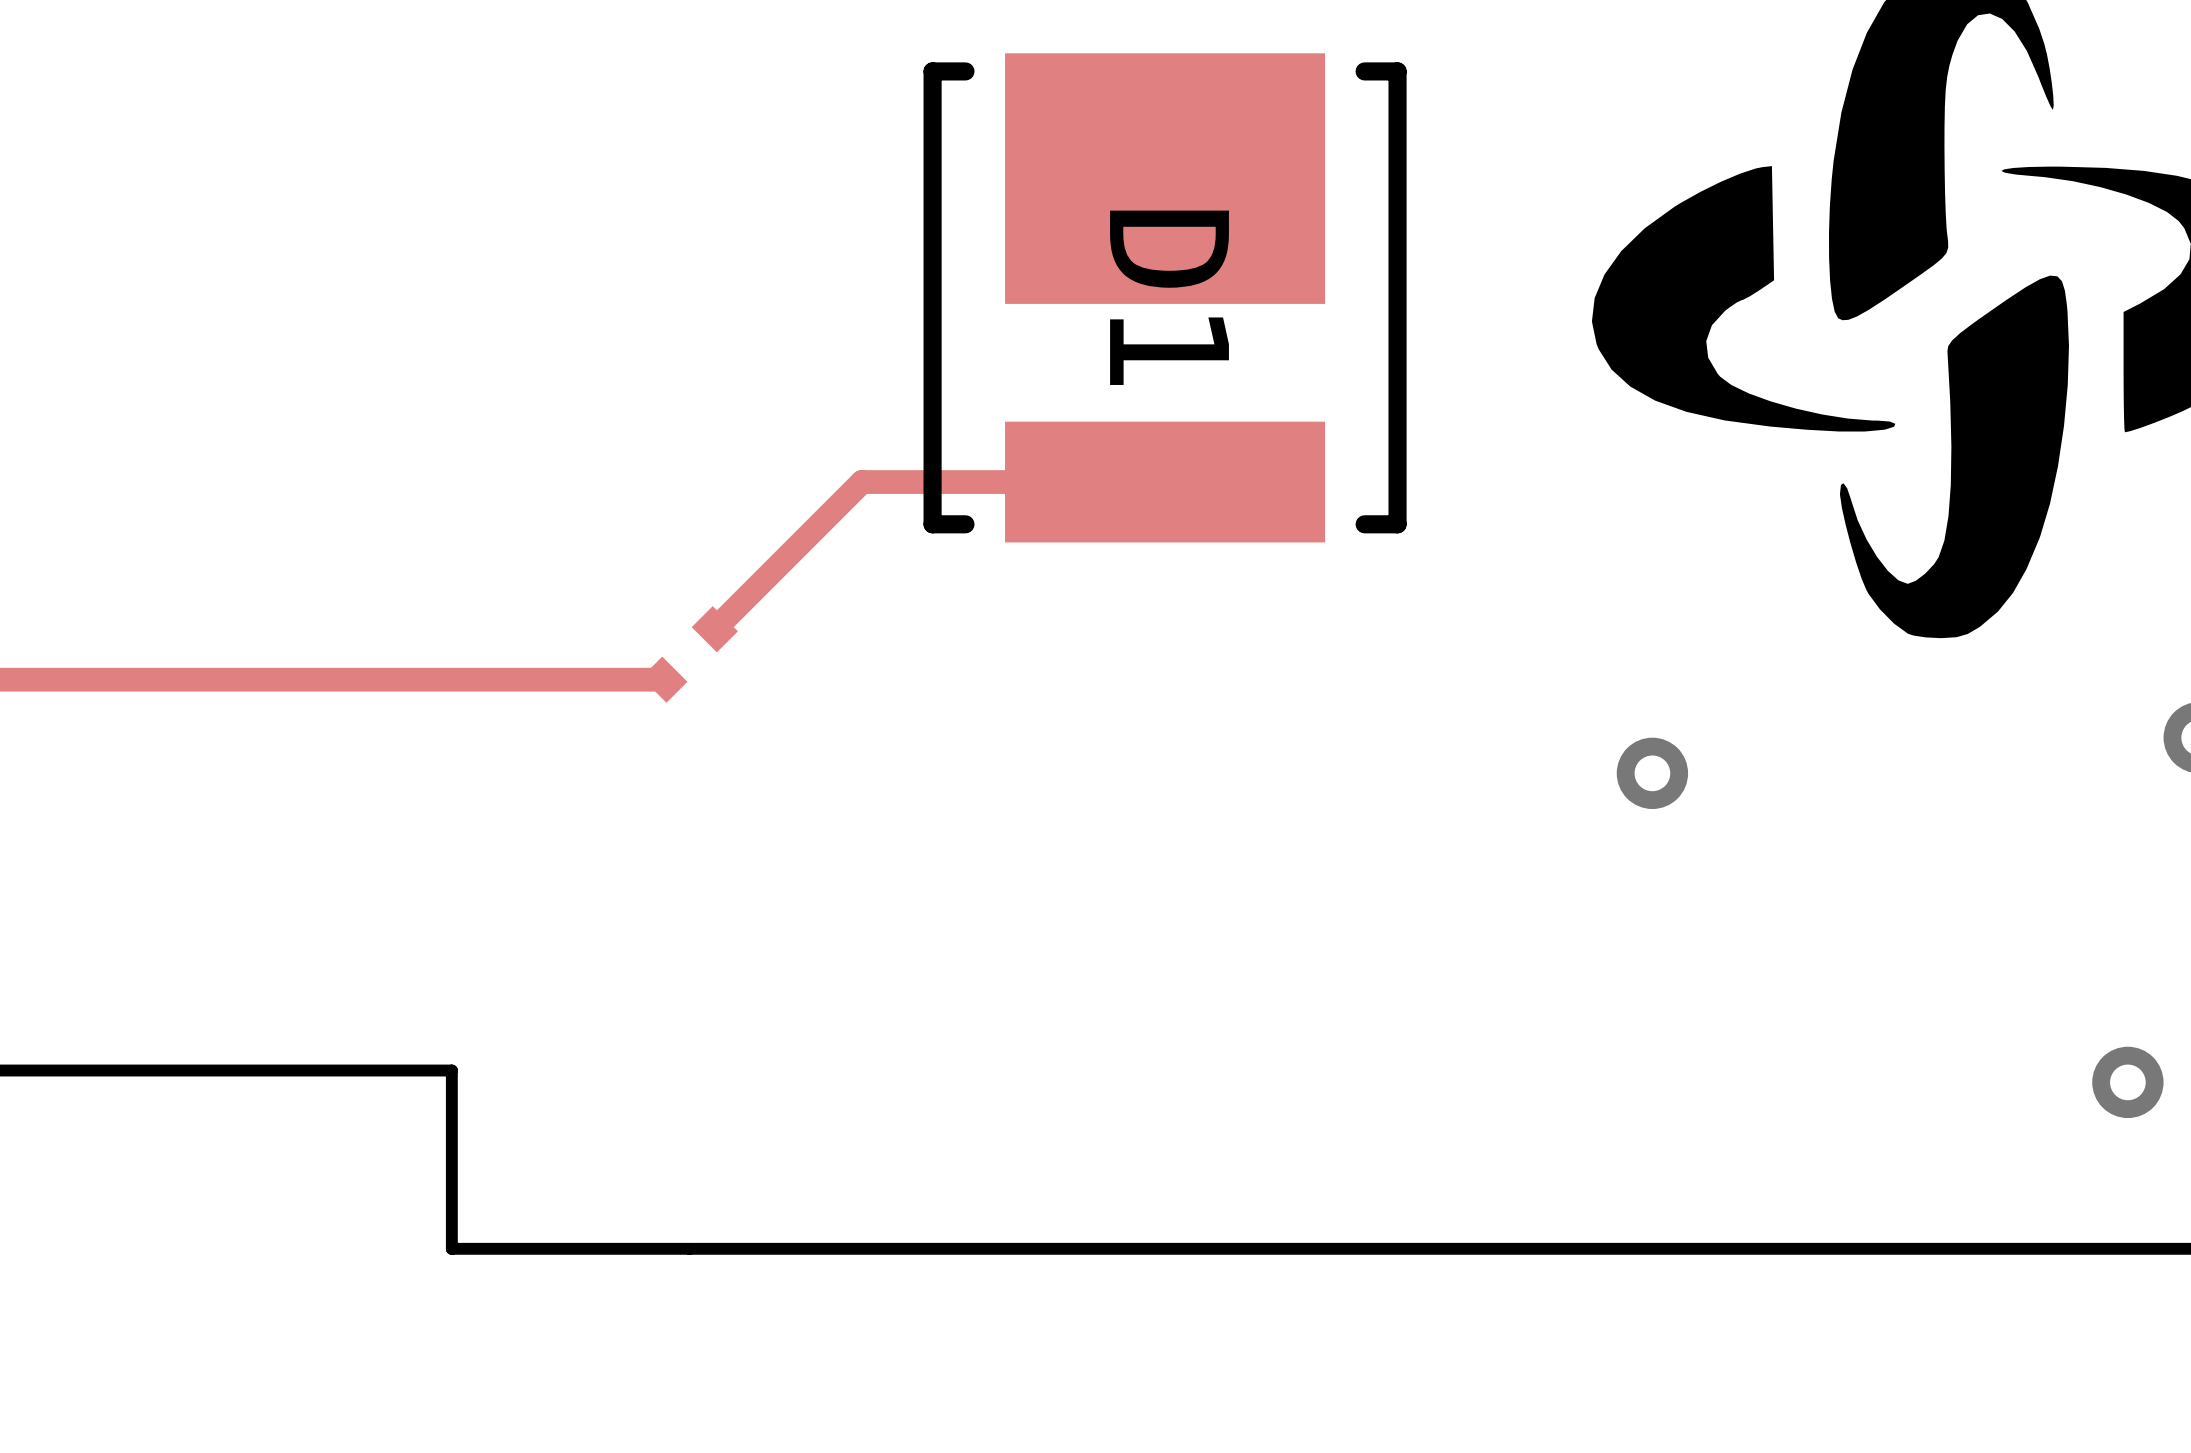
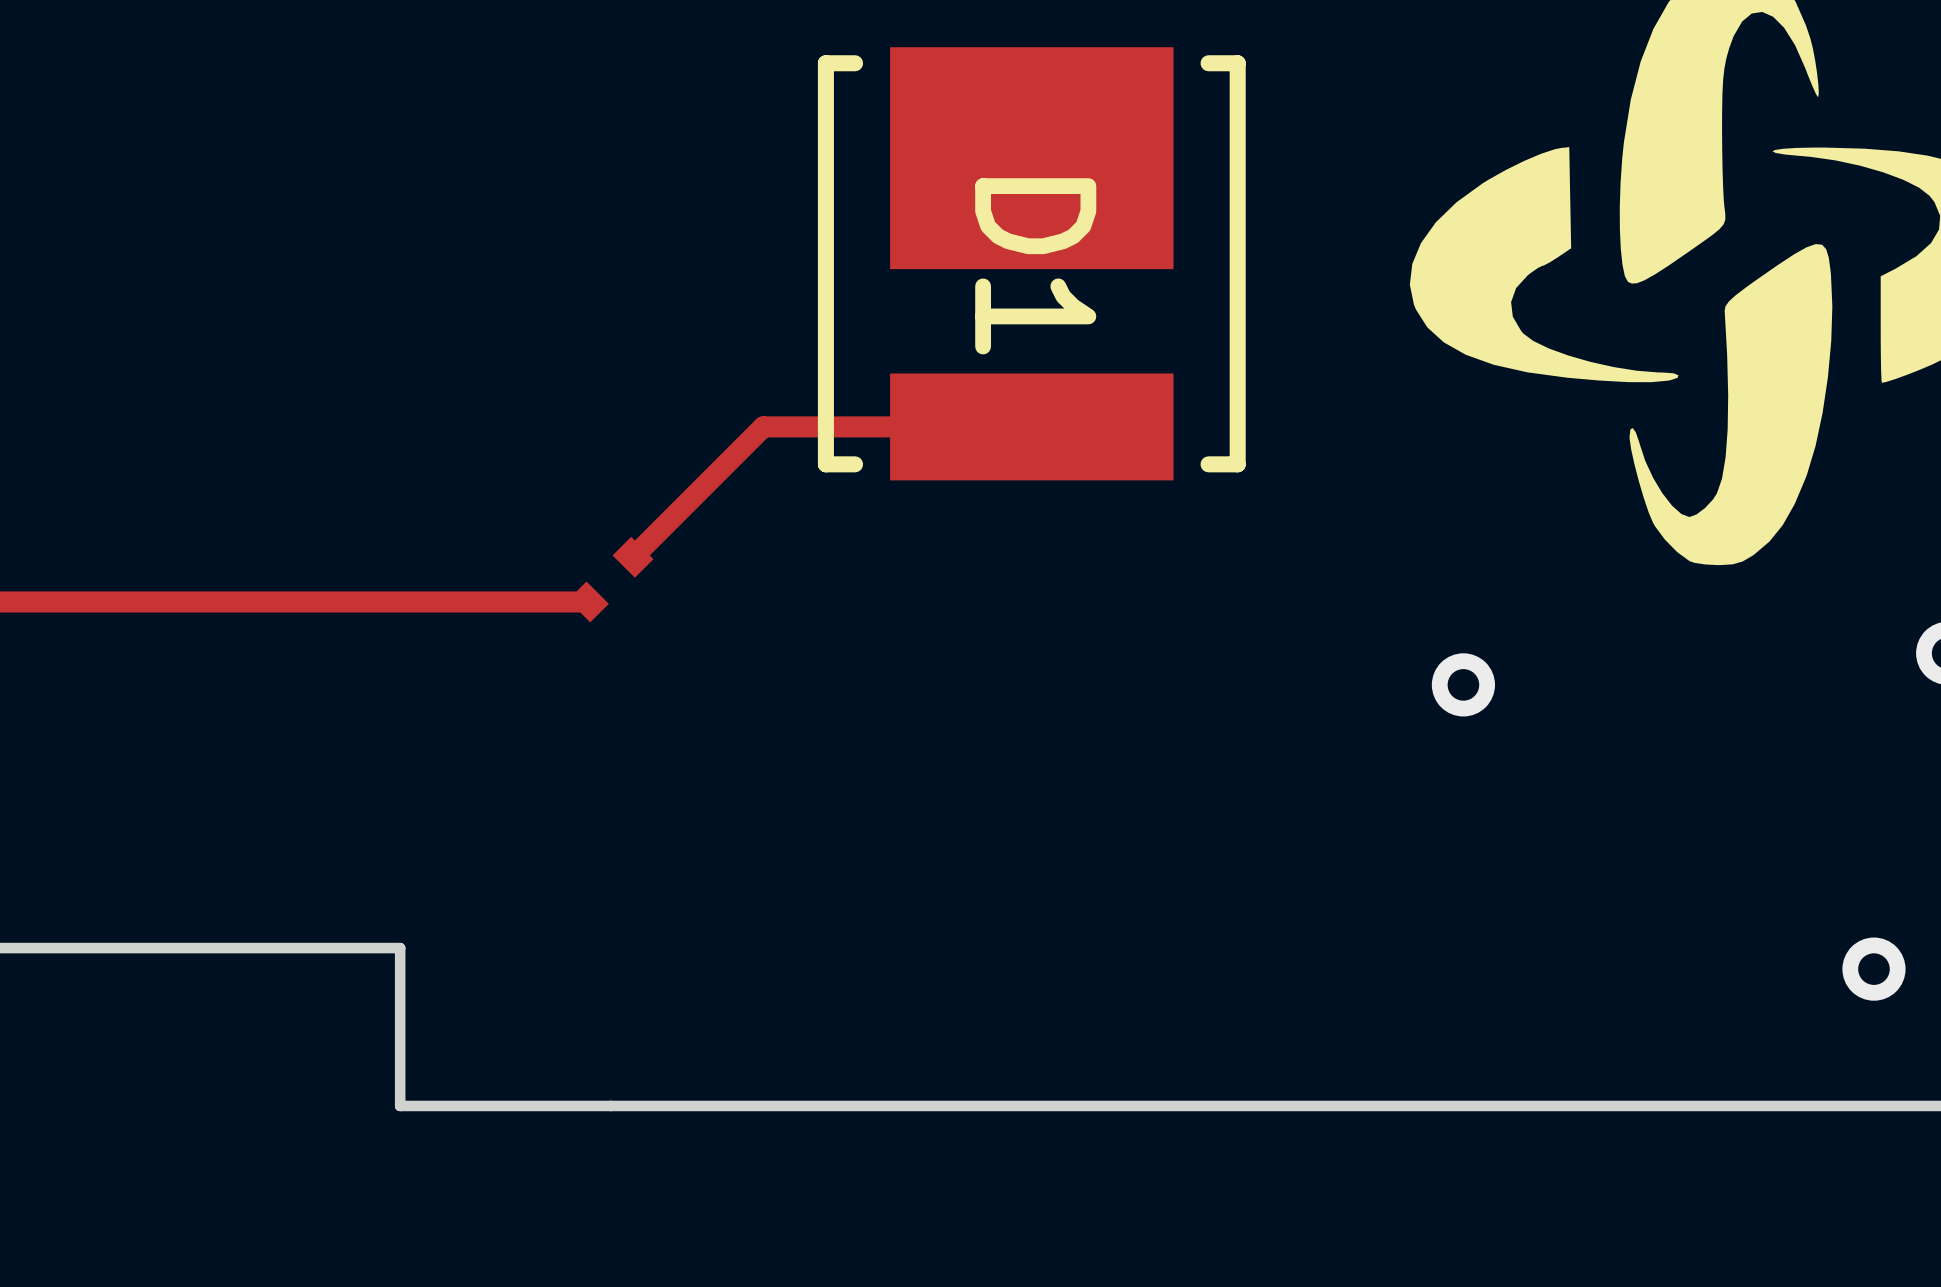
via position: (2127, 1082) -> (1873, 969)

